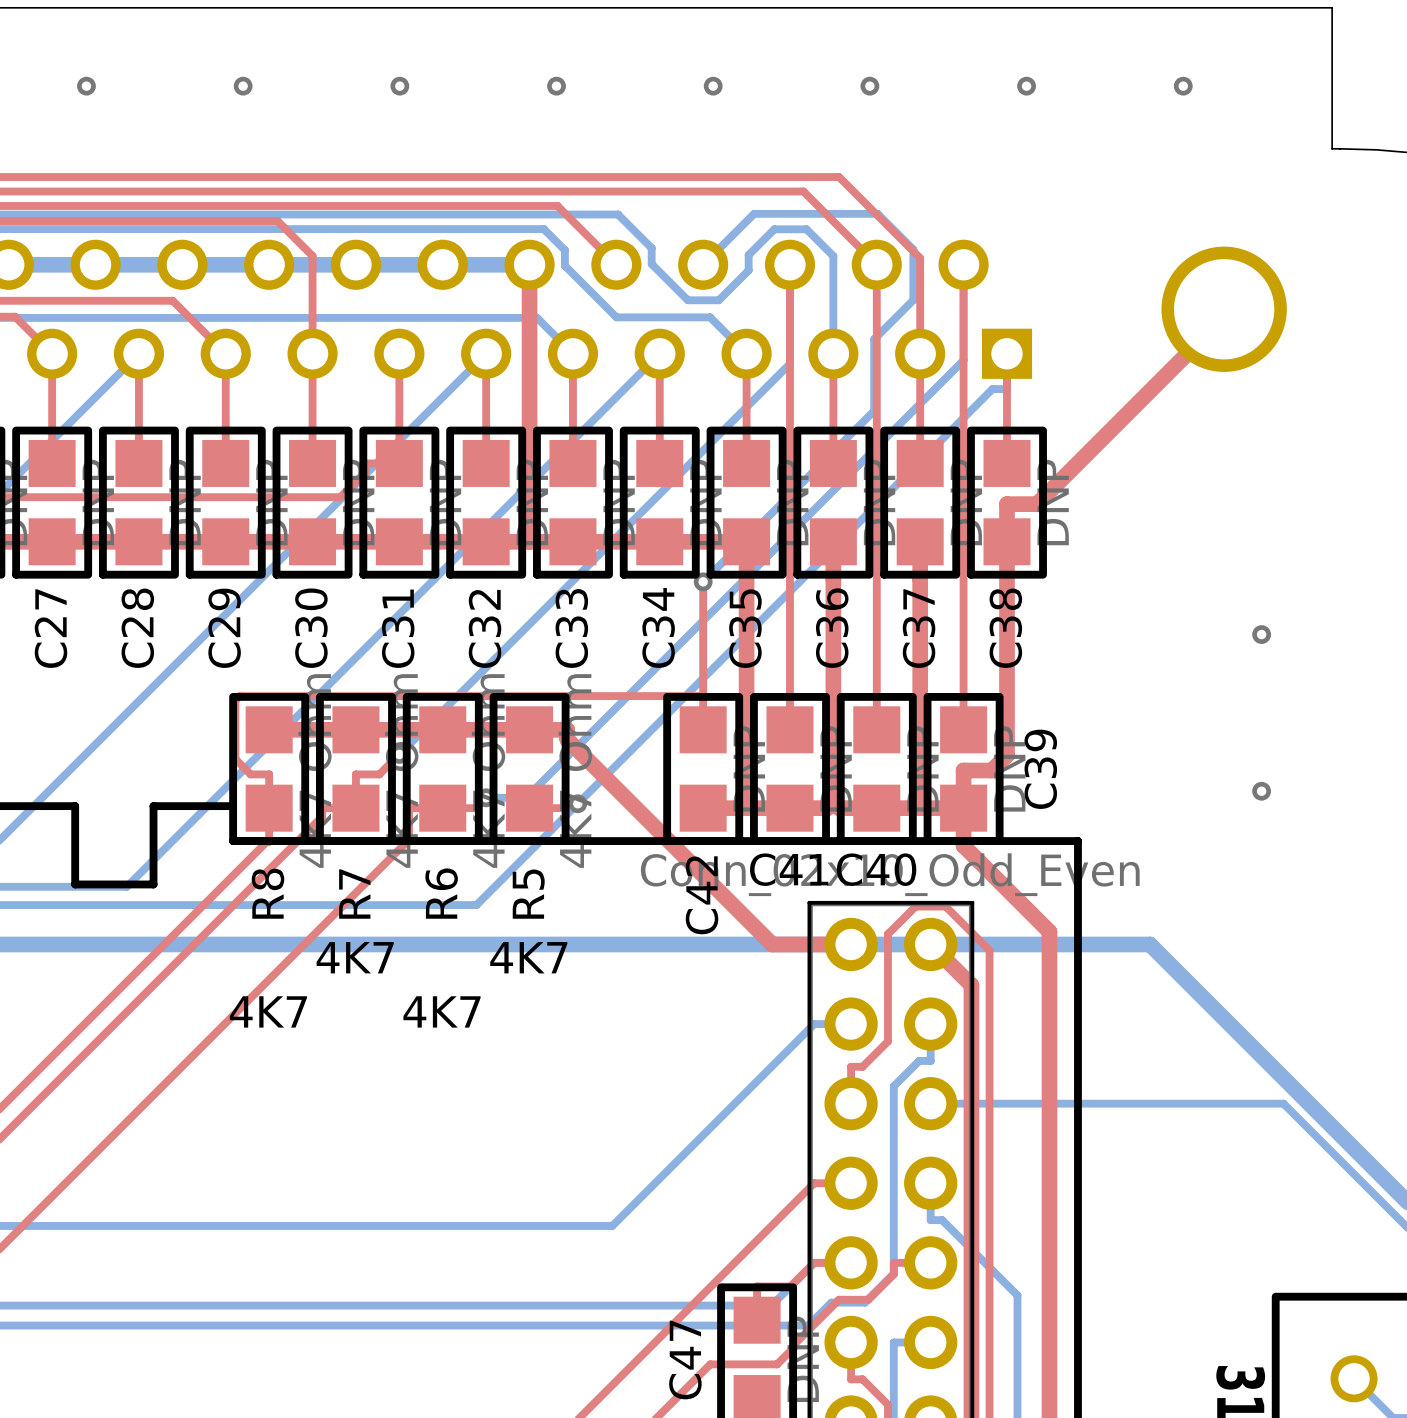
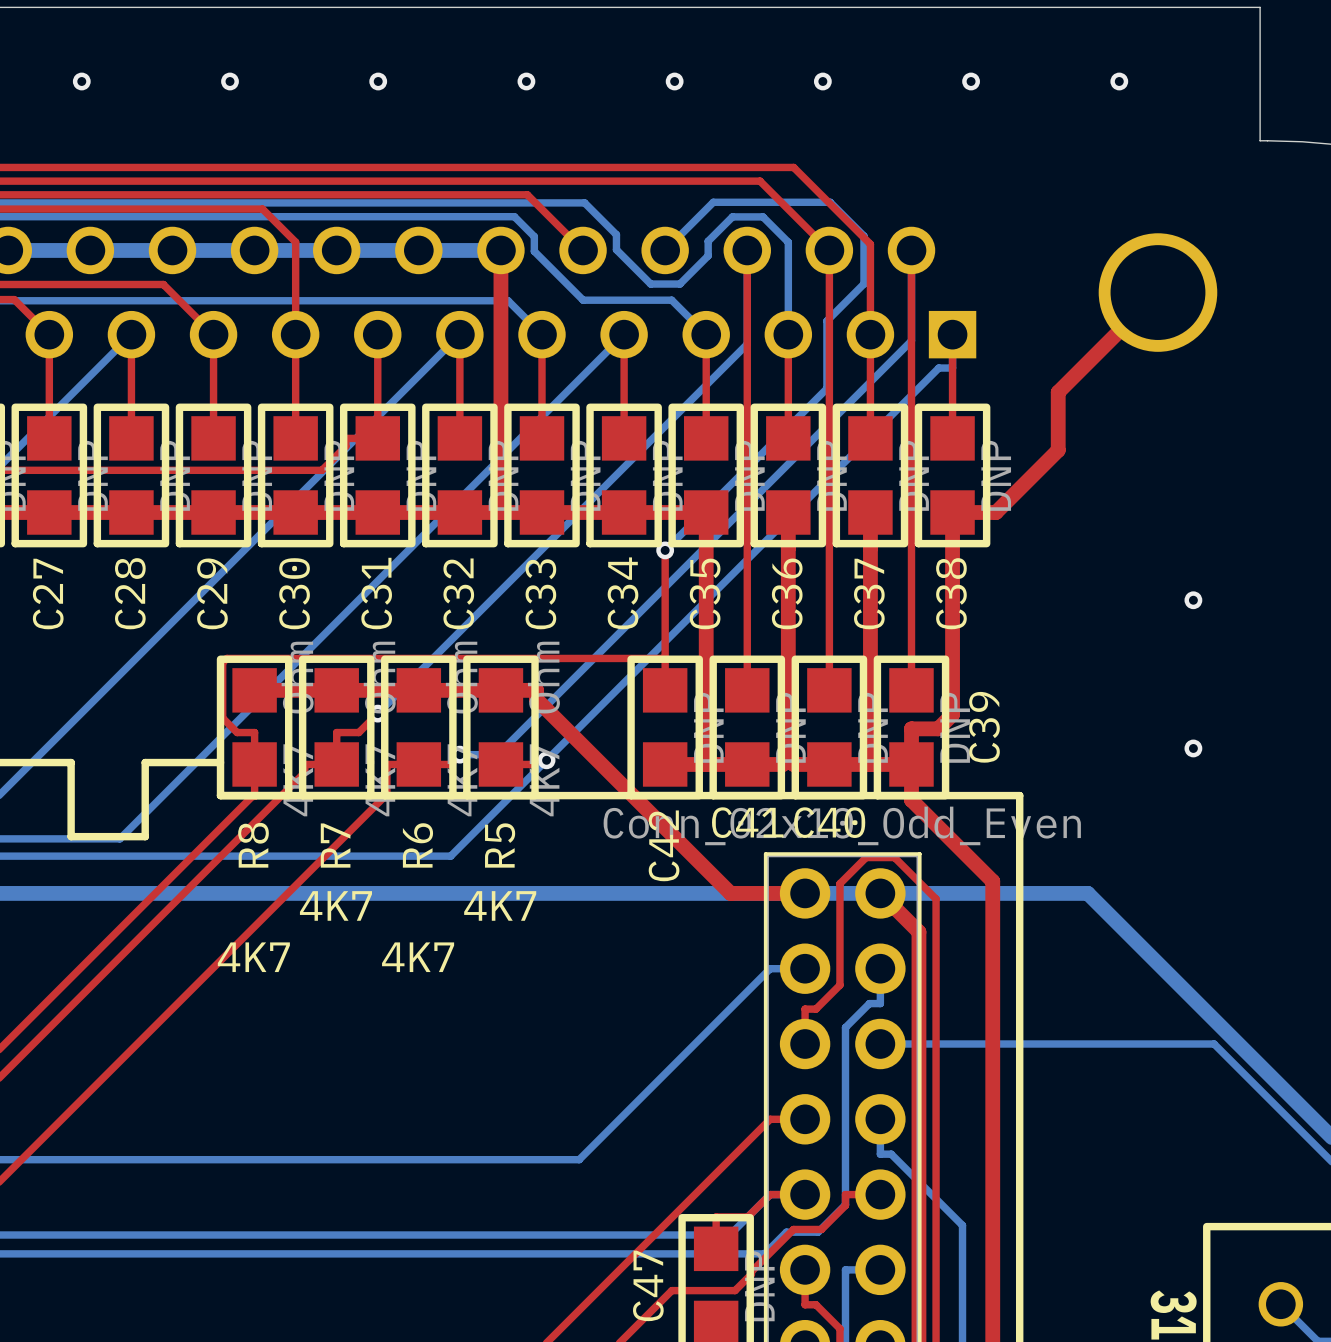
top track: (1224, 309) (1224, 316) (1036, 504) (1006, 504) (1006, 541) -> (1157, 292) (1058, 392) (1058, 450) (995, 512) (952, 512)

